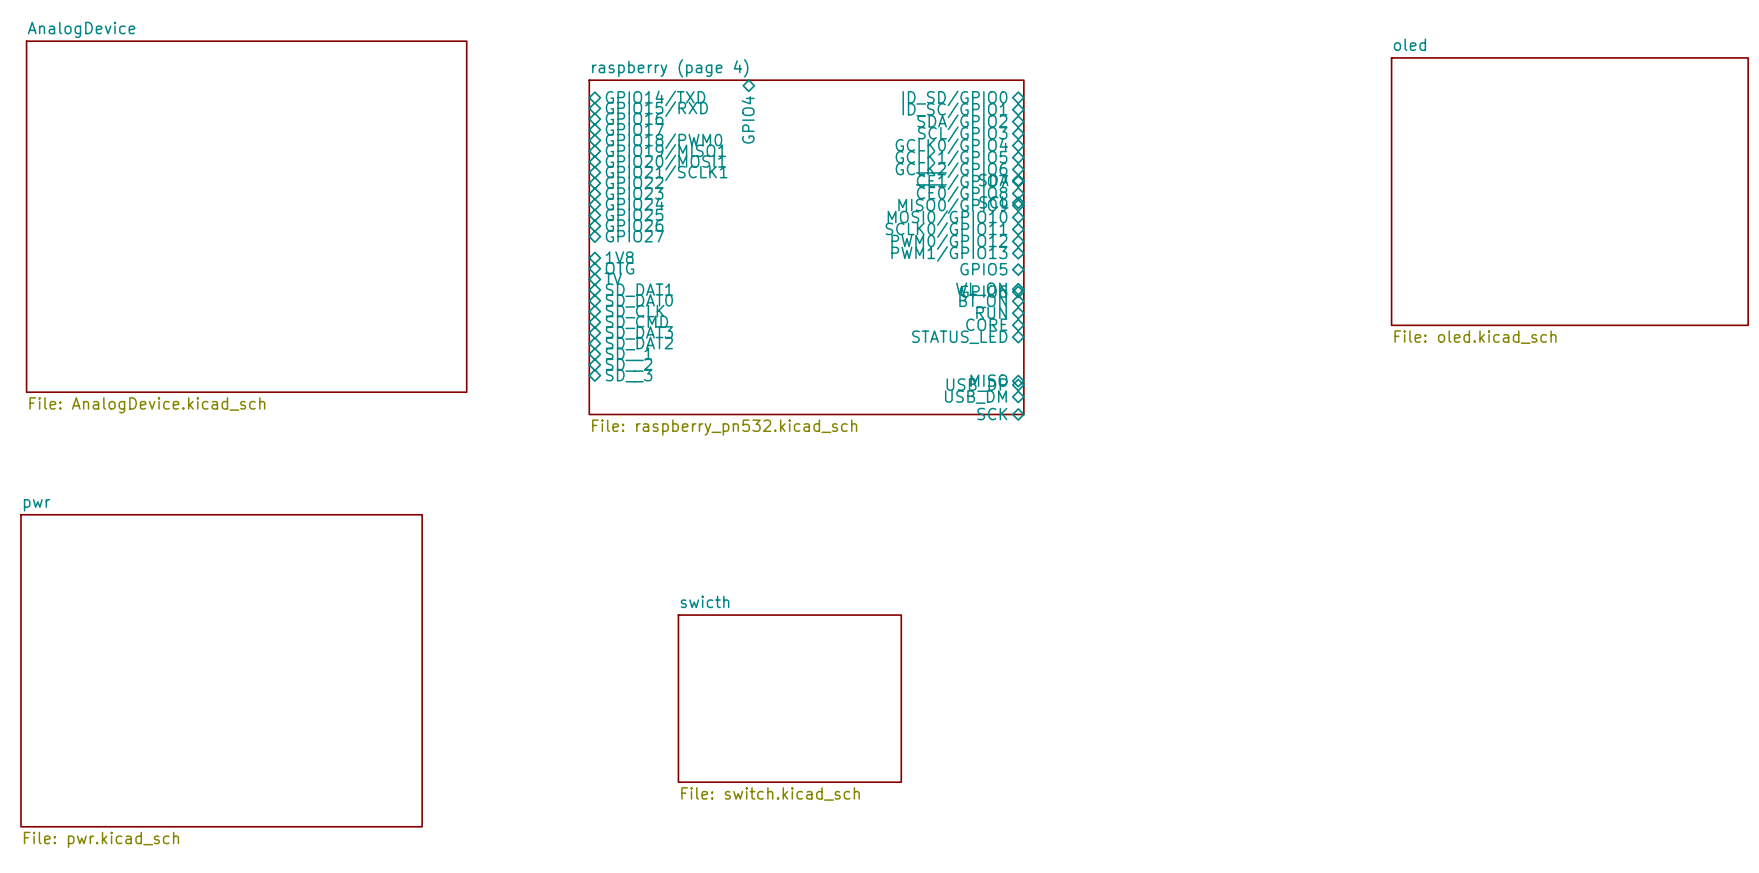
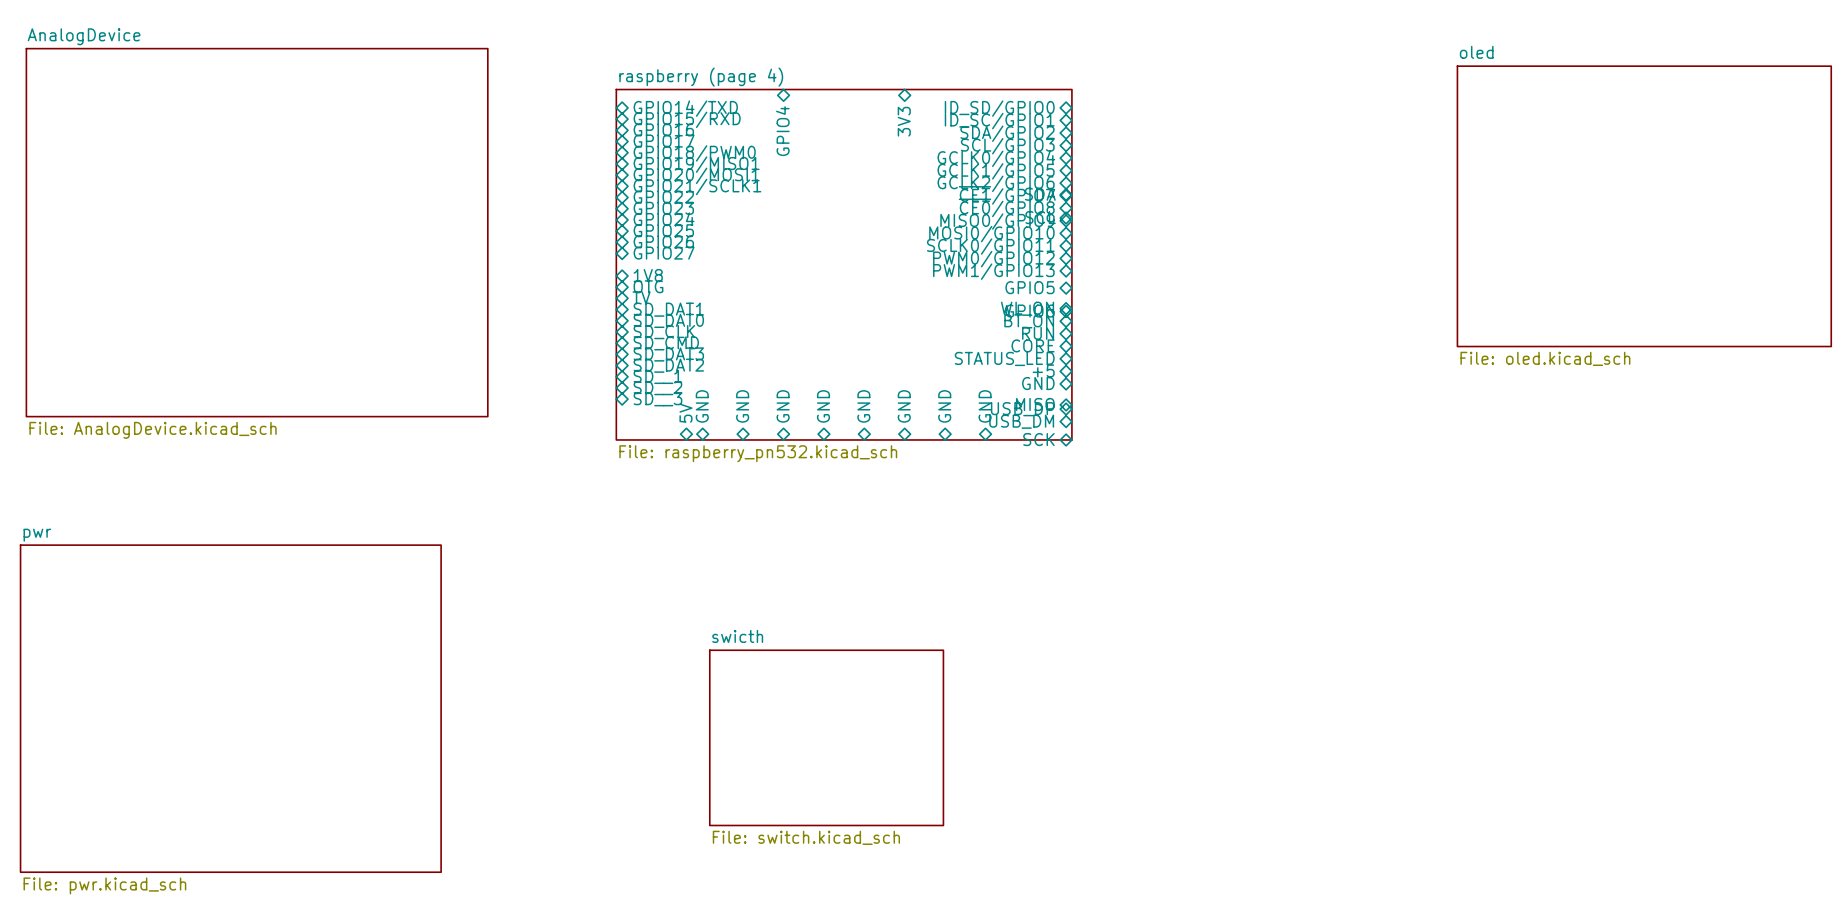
sheet pin: none -> 3V3 (904, 121)
sheet pin: none -> +5 (1043, 370)
sheet pin: none -> GND (1038, 383)
sheet pin: none -> GND (702, 406)
sheet pin: none -> GND (742, 406)
sheet pin: none -> GND (783, 406)
sheet pin: none -> GND (823, 406)
sheet pin: none -> GND (863, 406)
sheet pin: none -> GND (904, 406)
sheet pin: none -> GND (944, 406)
sheet pin: none -> GND (985, 406)
sheet pin: none -> 5V (685, 413)

